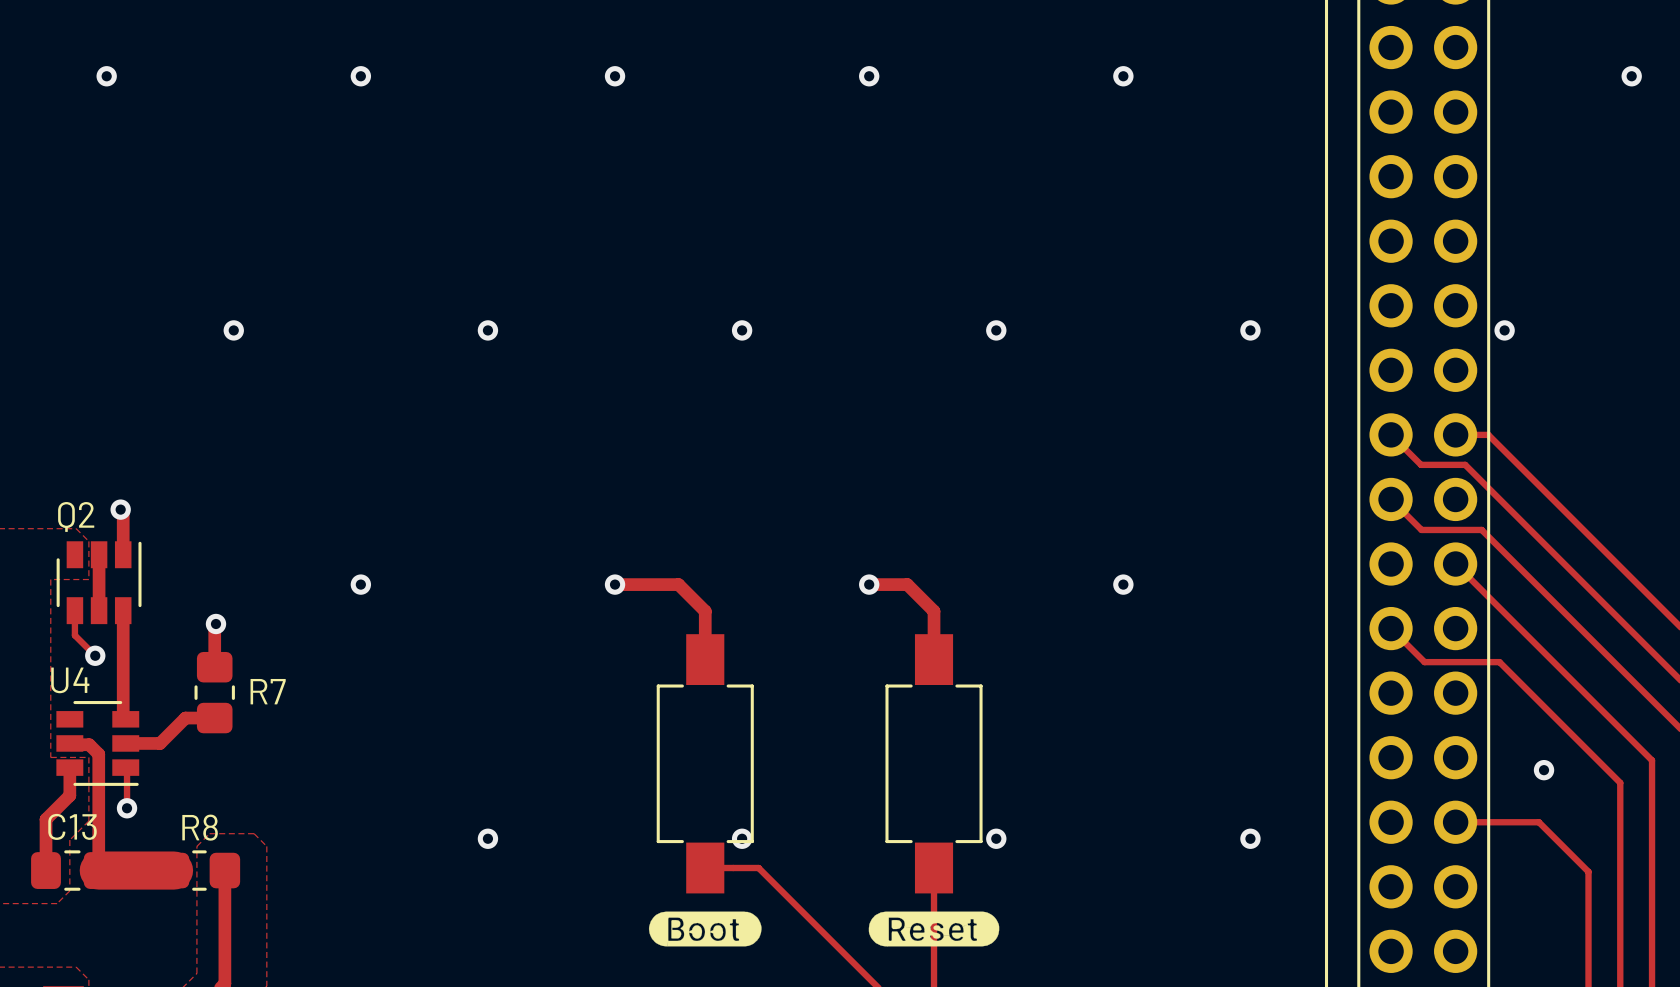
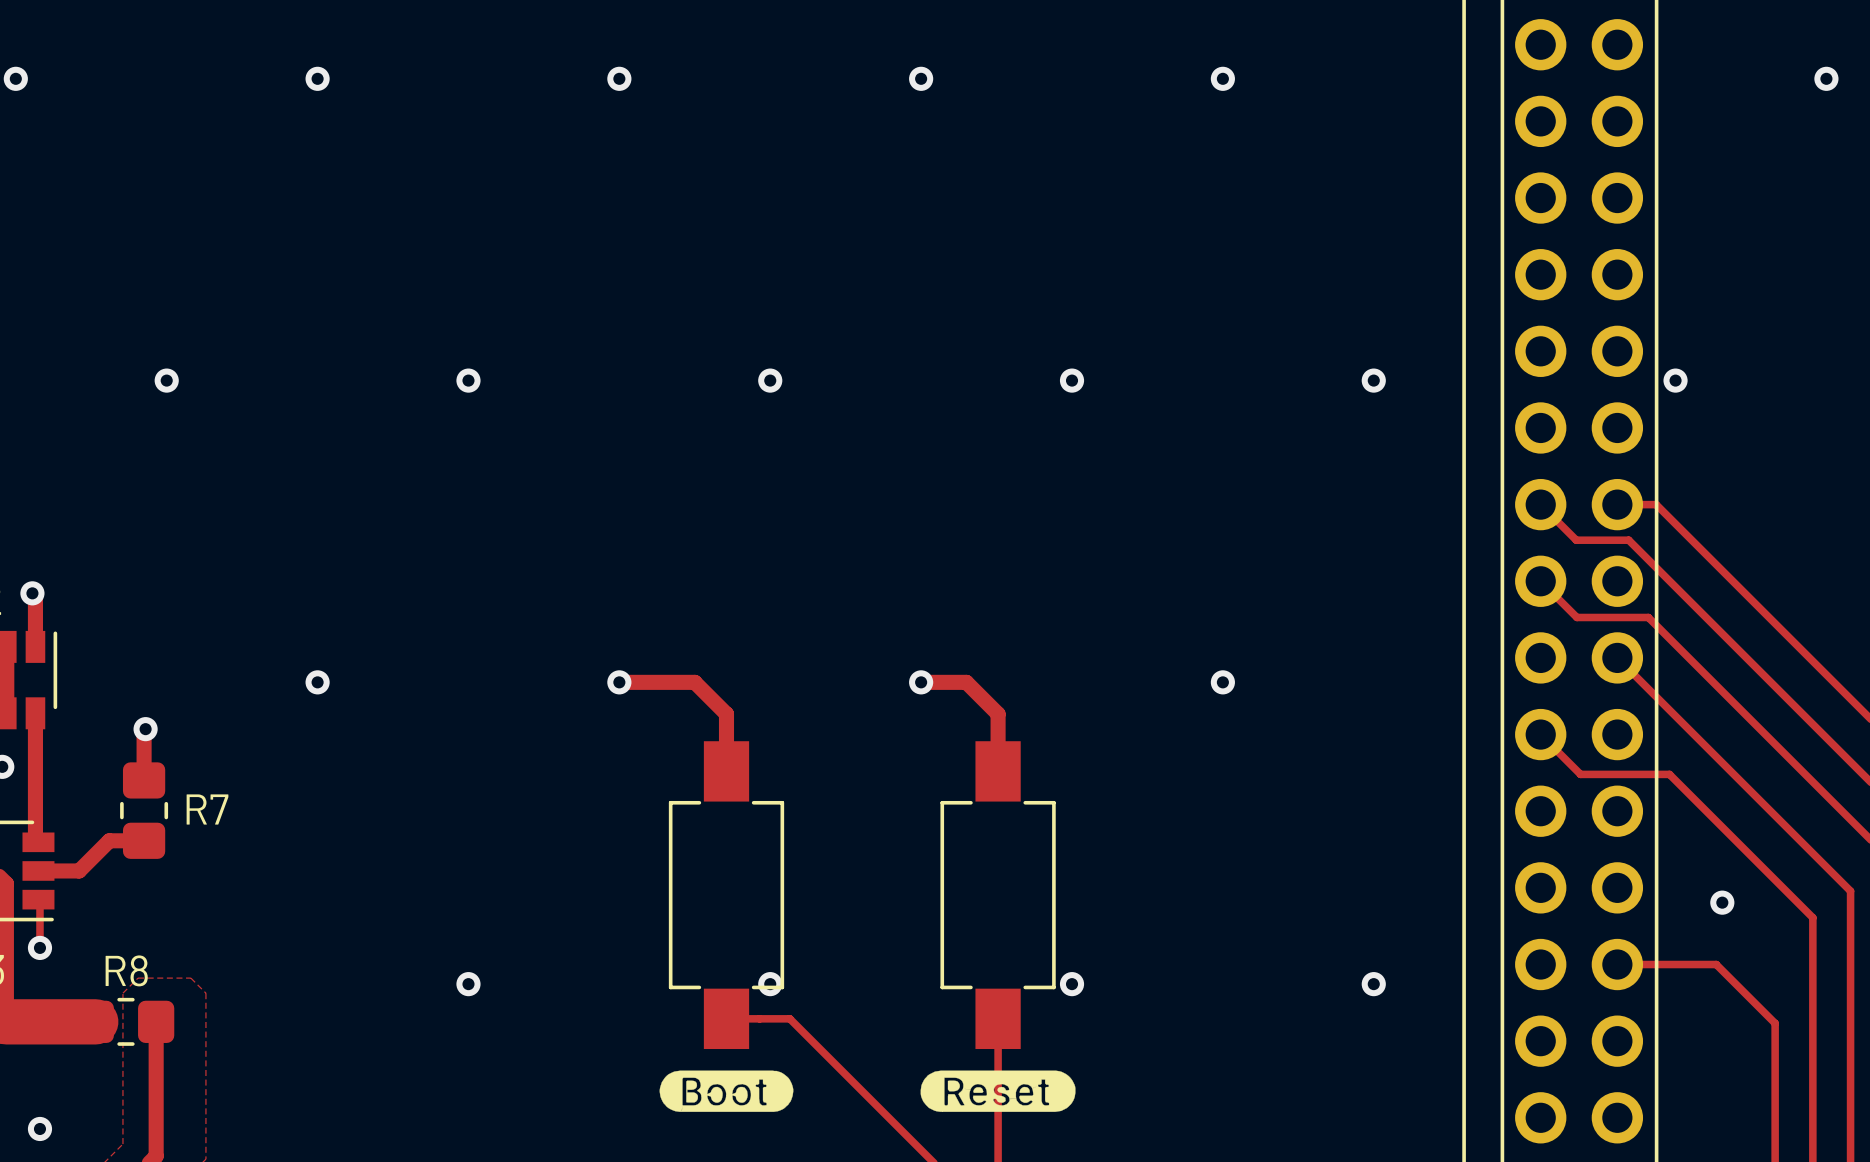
via: none -> (39, 1128)

